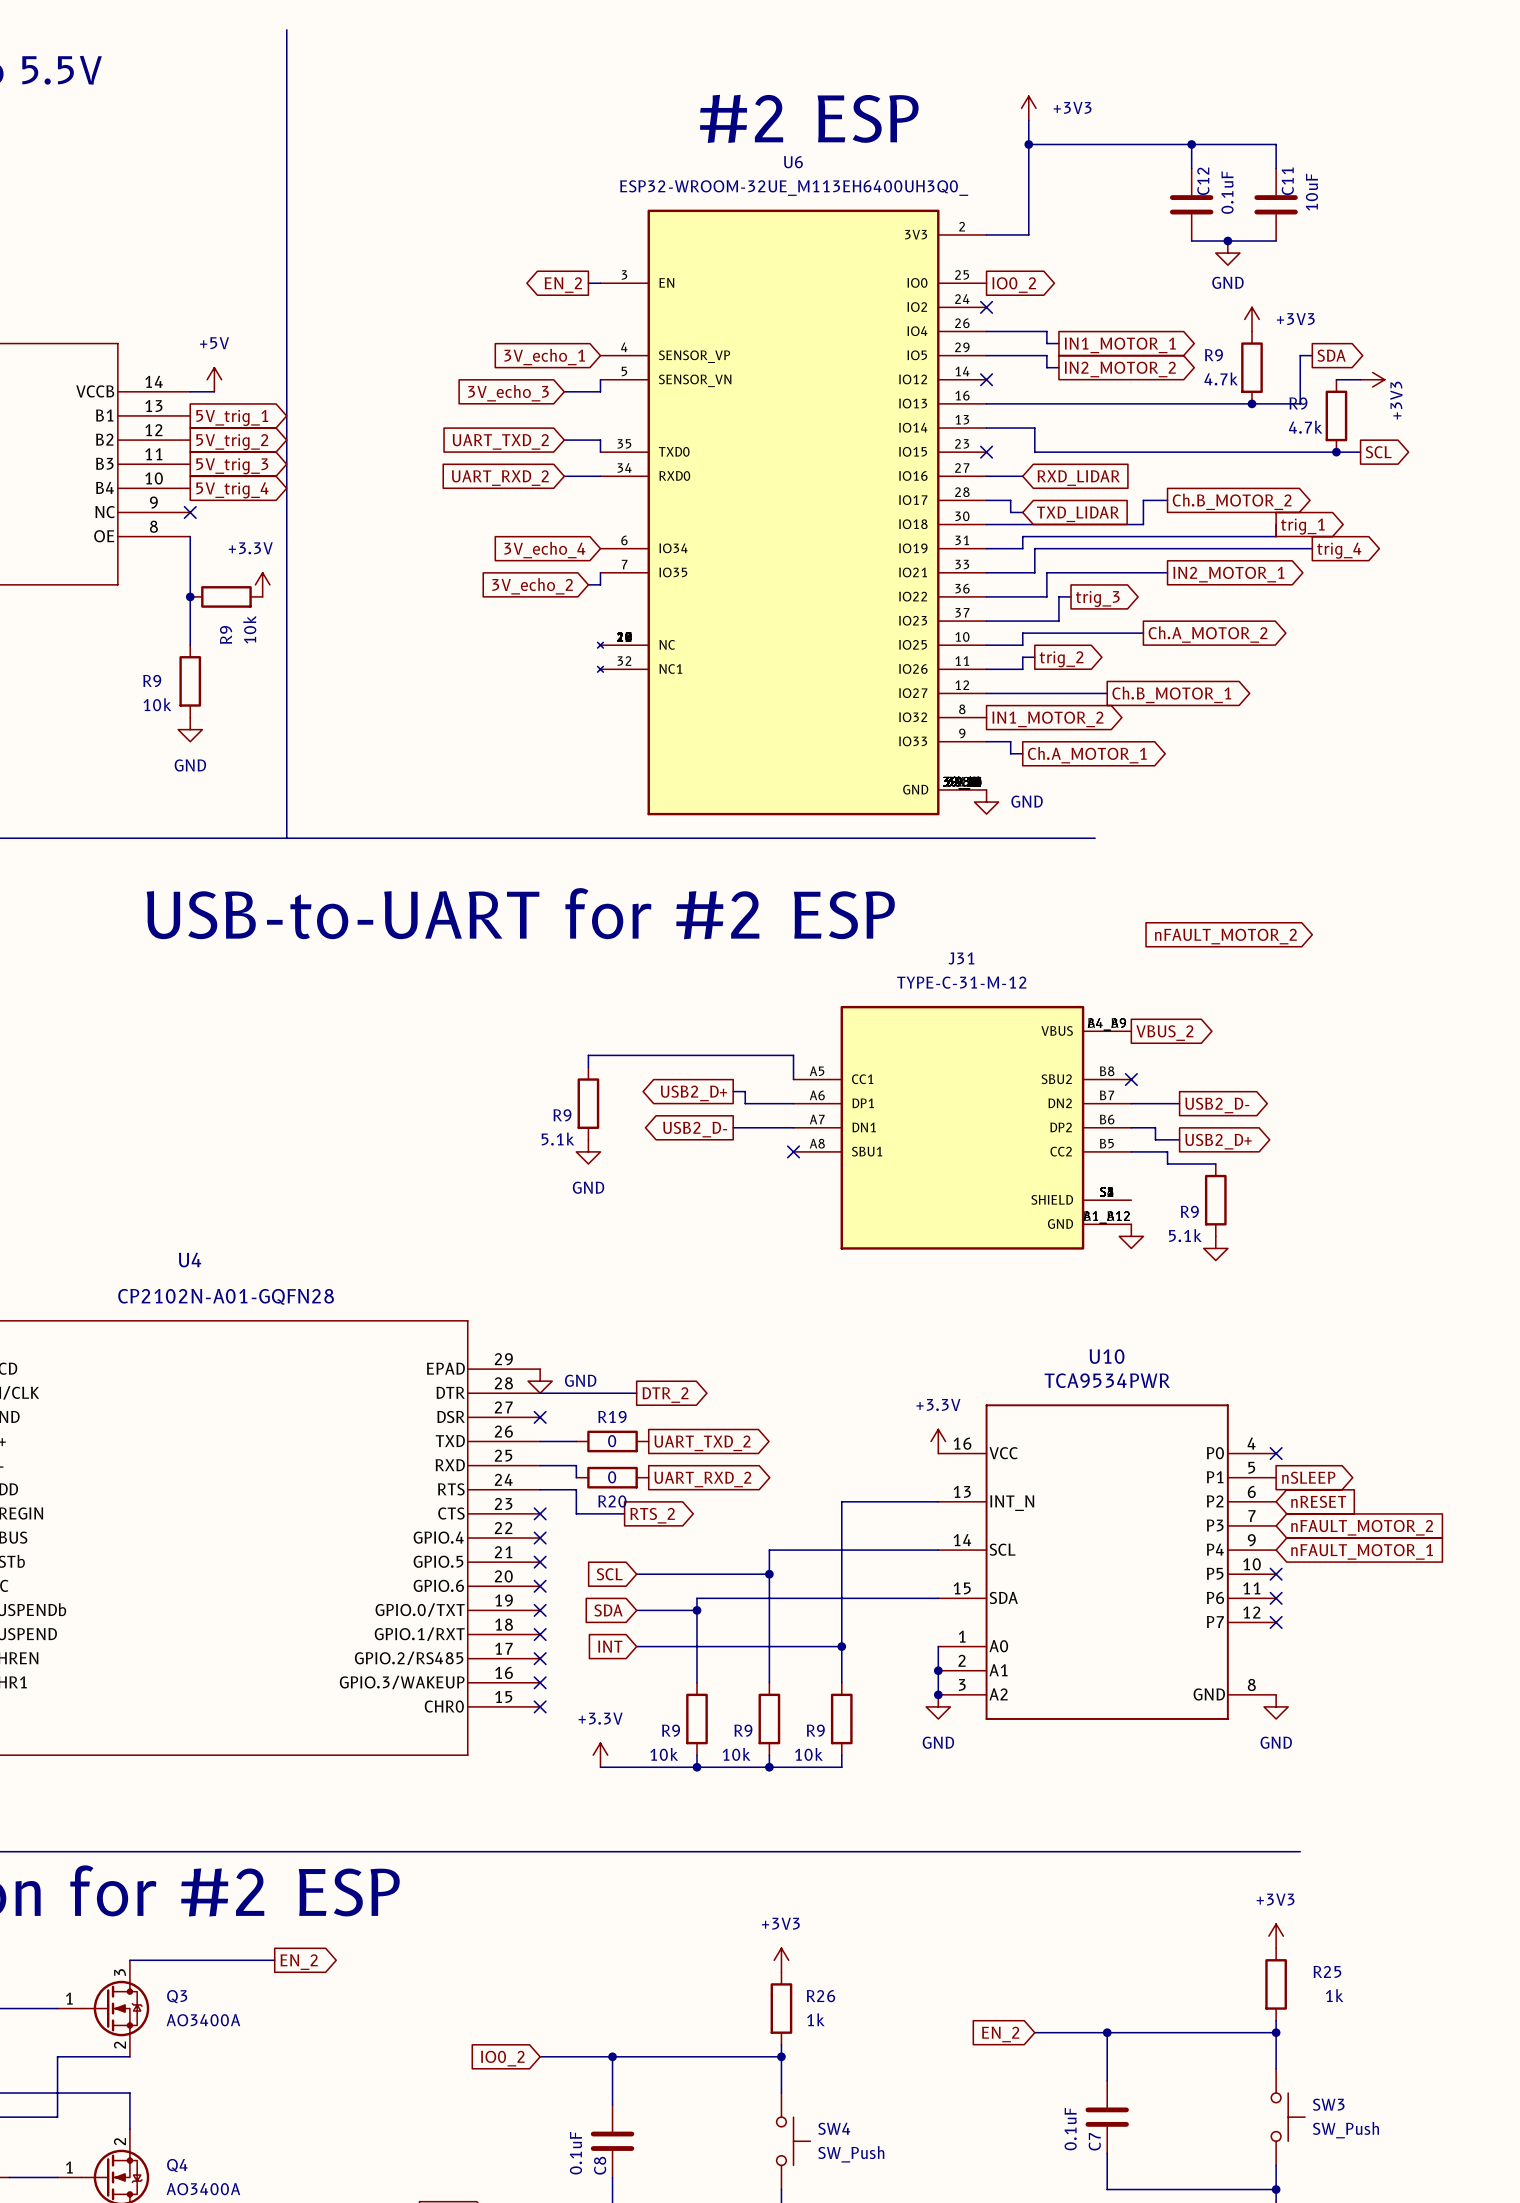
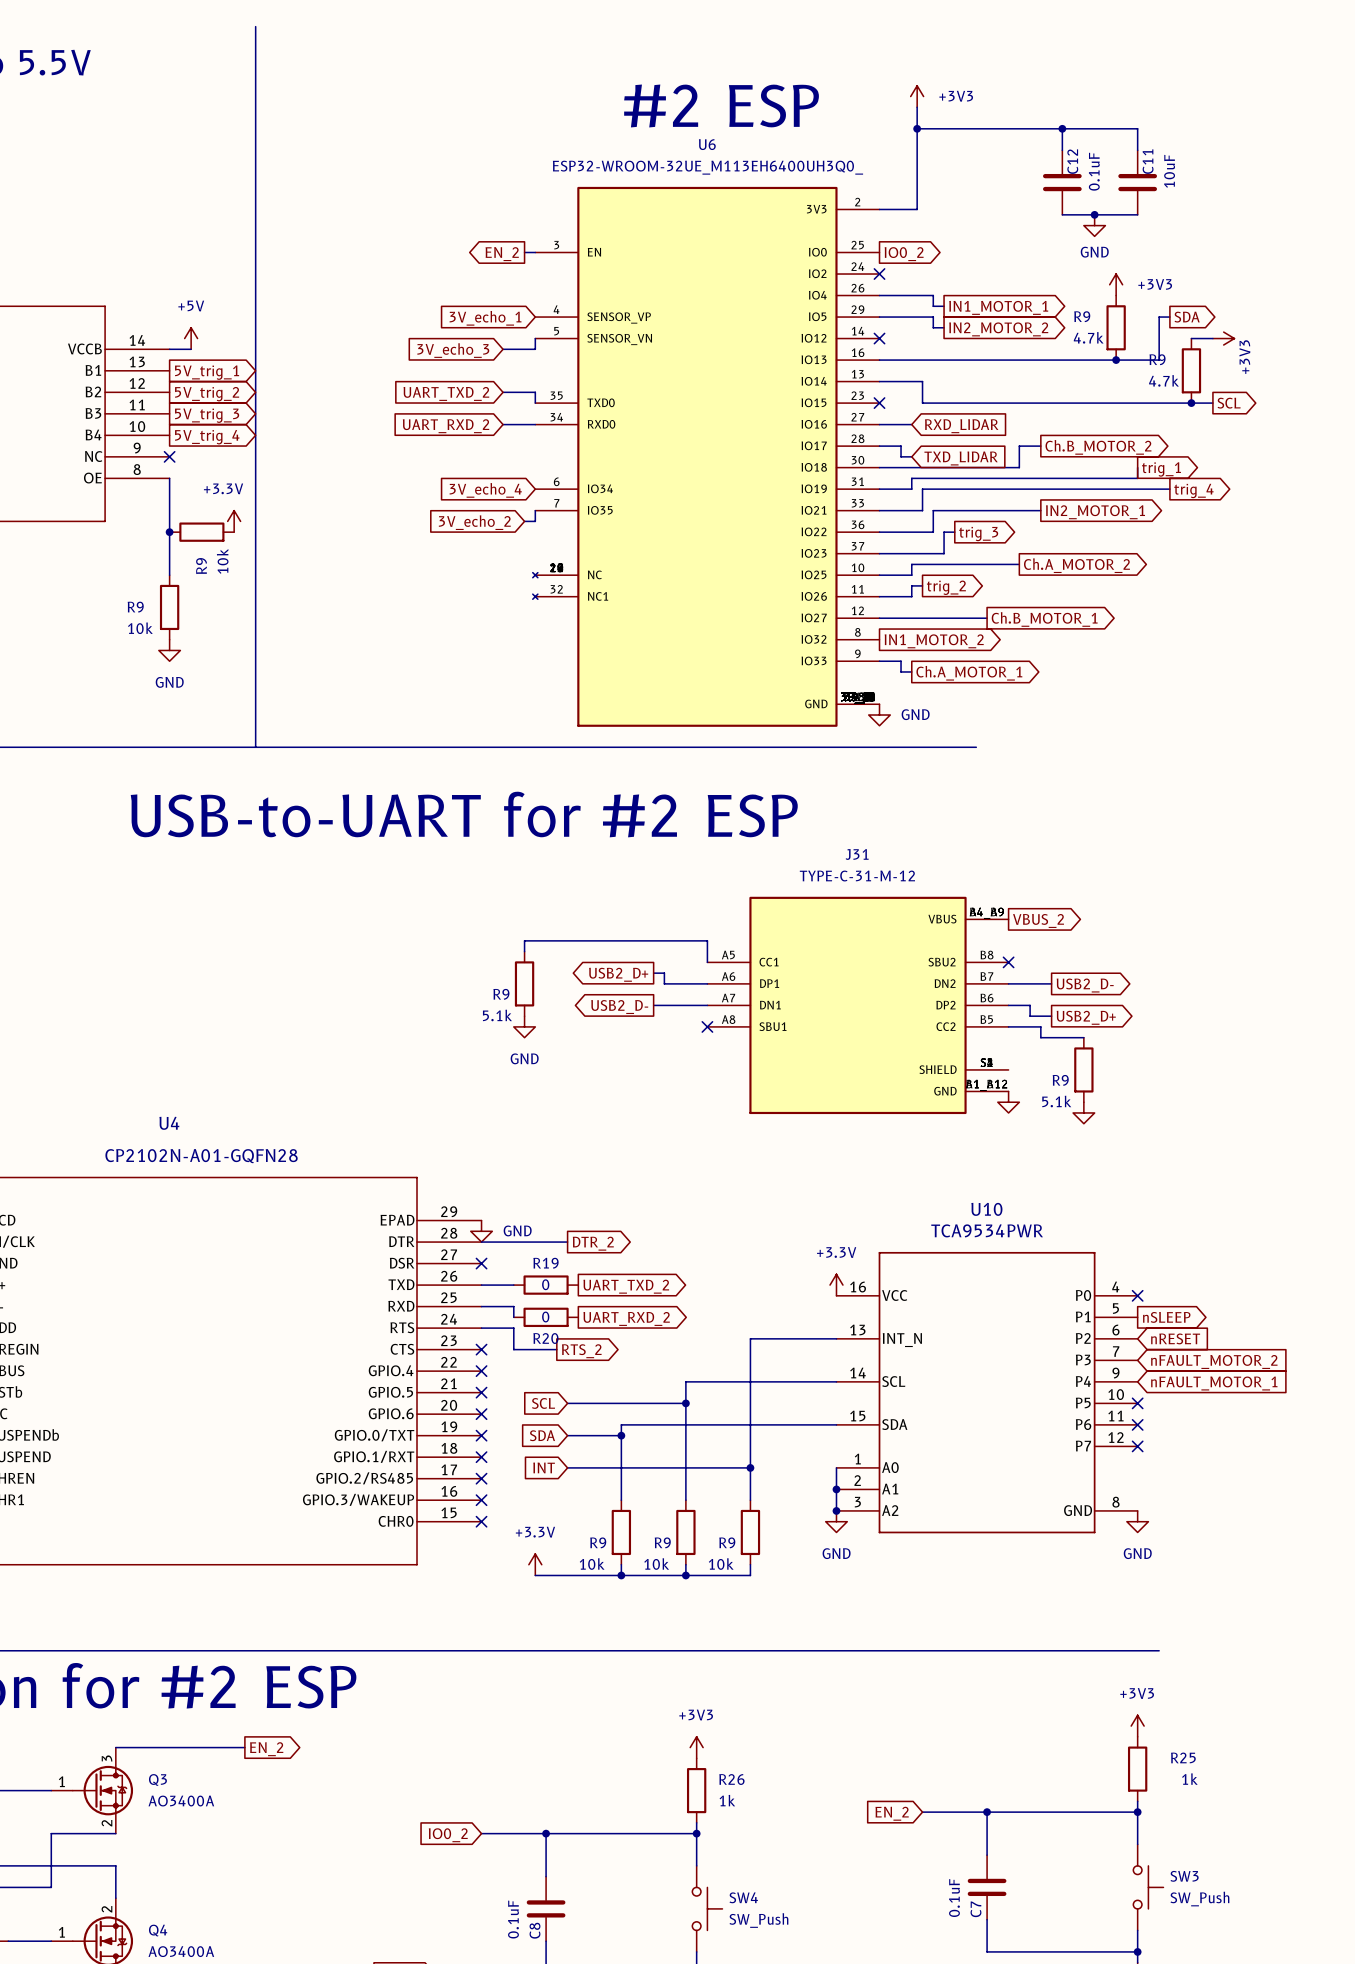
global label: nFAULT_MOTOR_2 (1225, 936) -> none

